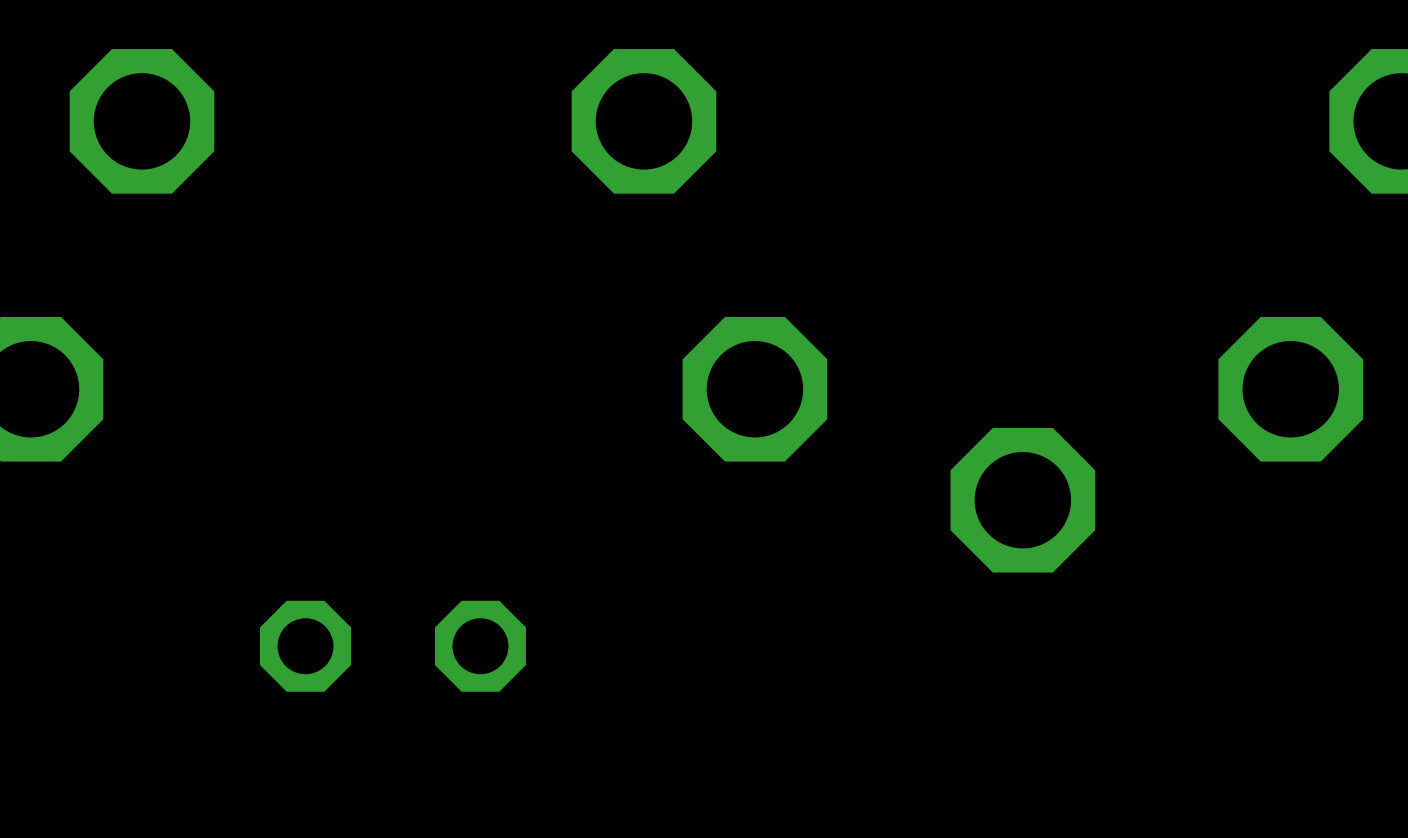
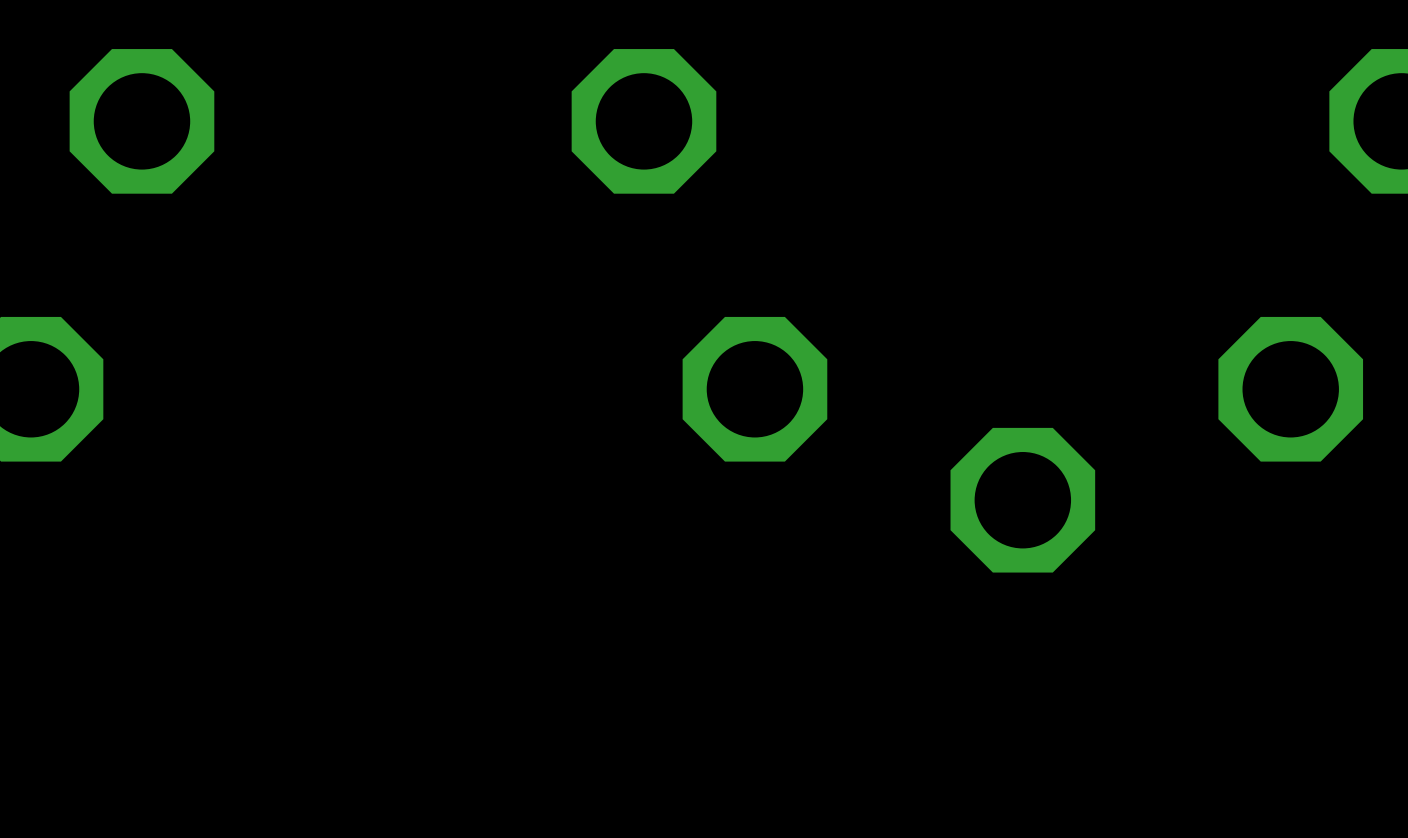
part: (392, 646) -> none

